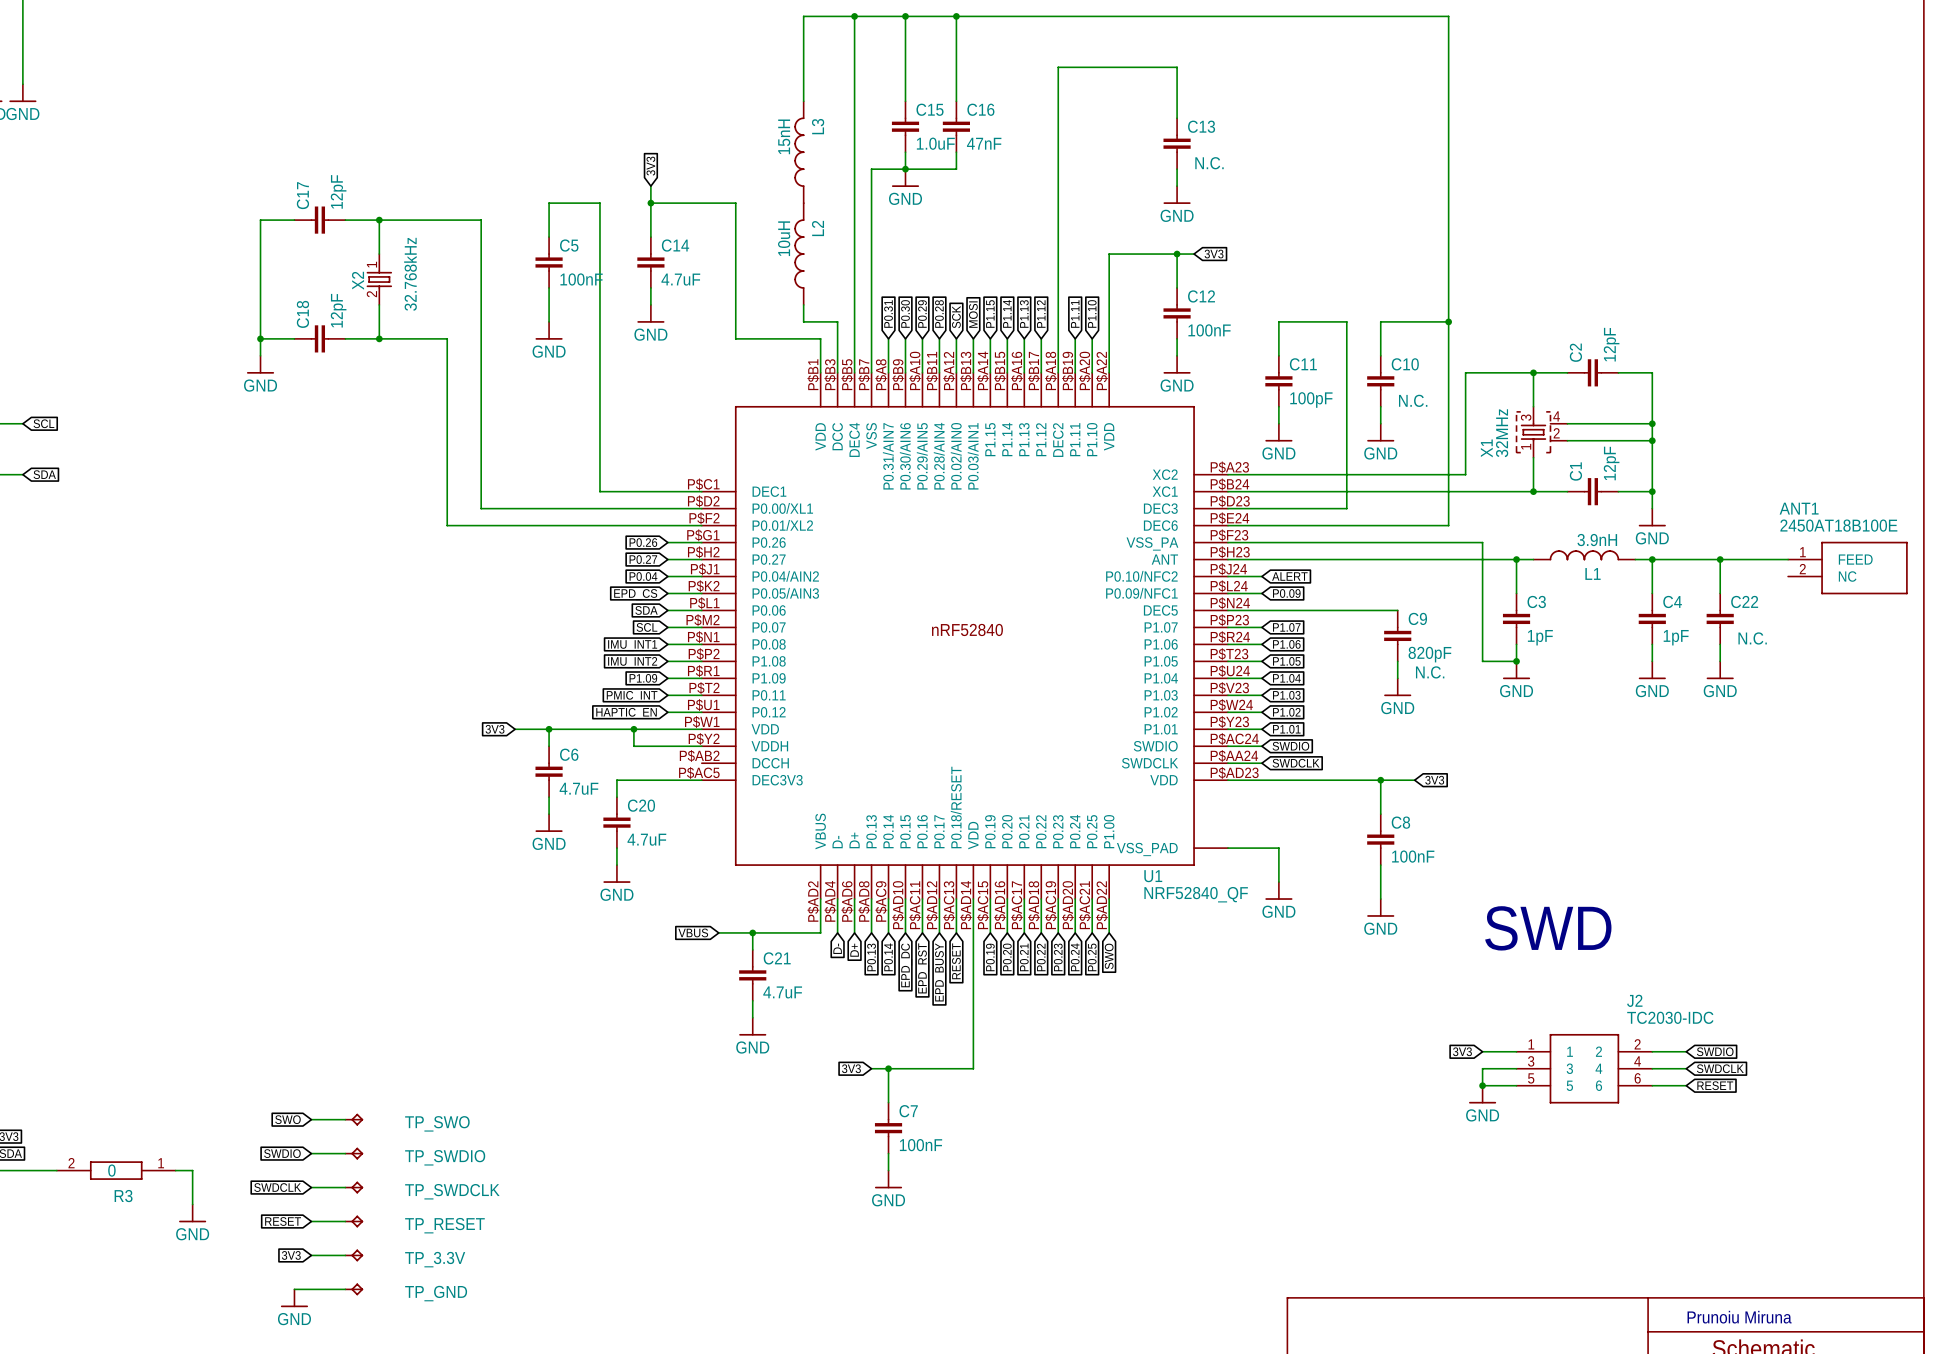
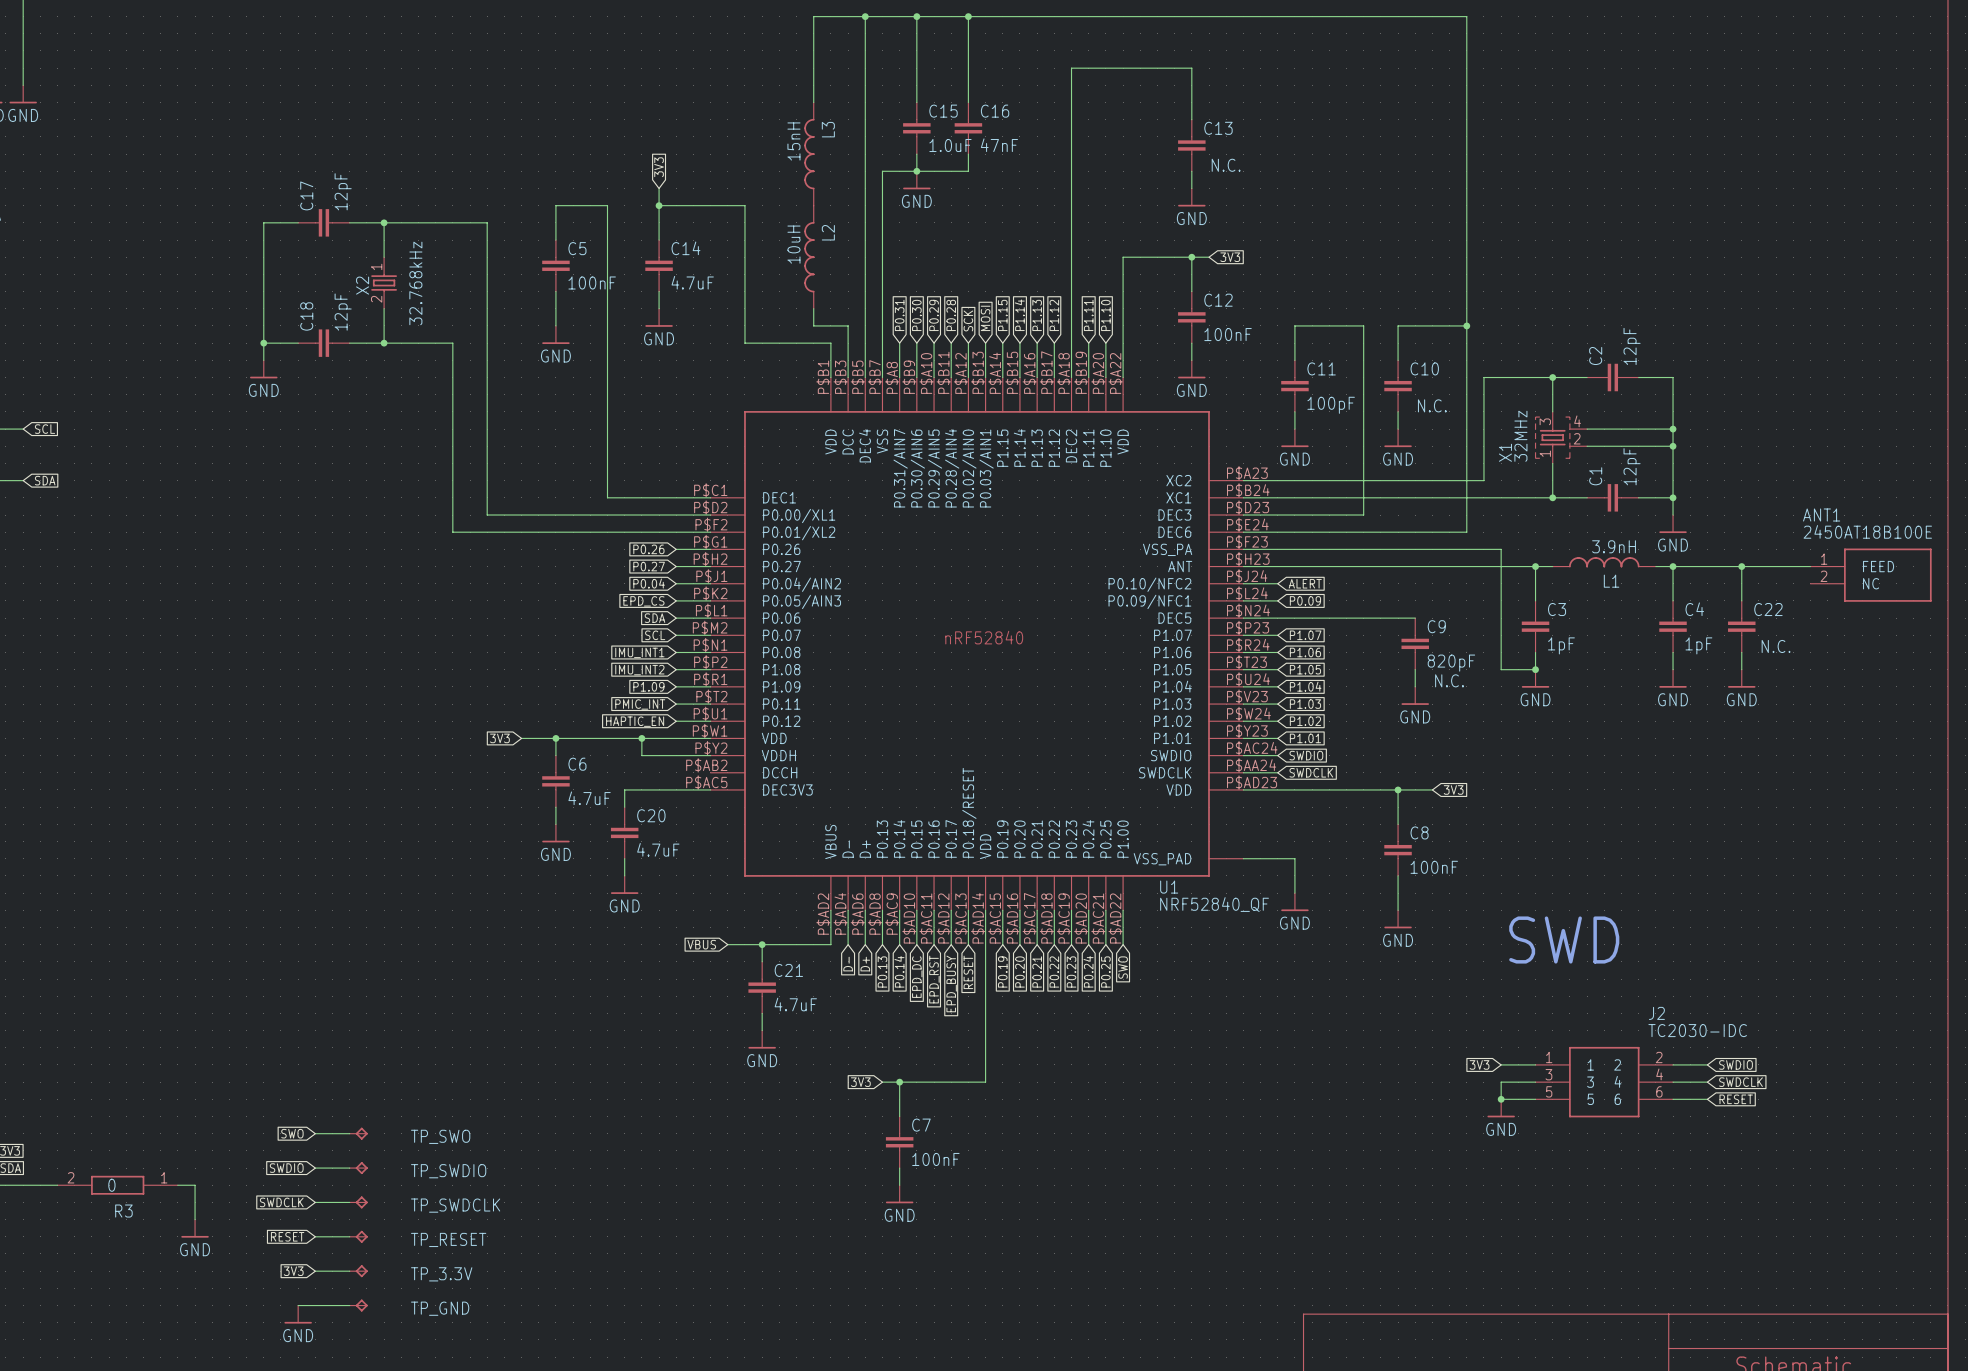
text: Prunoiu Miruna (1739, 1317) -> none

